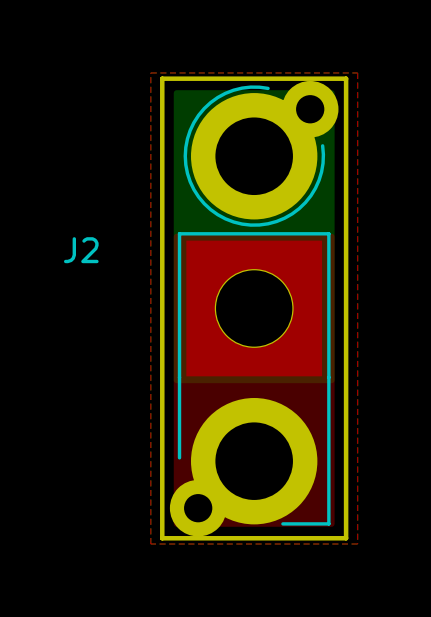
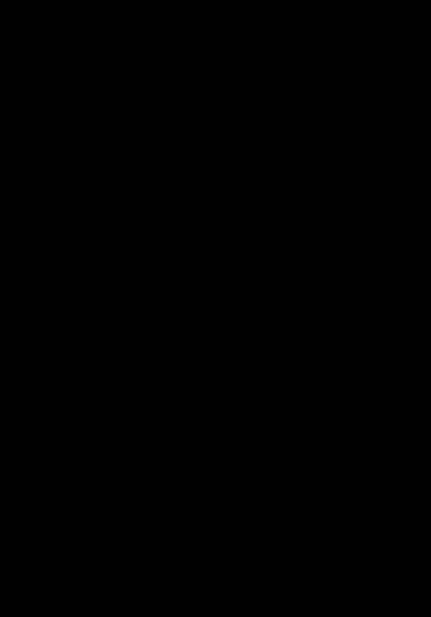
top zone outline: (150, 72) (150, 544) (357, 544) (357, 72) (150, 72) -> none
board edge: (162, 78) (346, 78) (346, 538) (162, 538) (162, 78) -> none
line: (268, 88) (242, 88) (225, 93) (204, 108) (193, 122) (187, 138) (185, 164) (193, 189) (204, 203) (217, 214) (242, 224) (259, 224) (284, 218) (305, 202) (315, 188) (321, 171) (322, 145) -> none
part: (264, 150) -> none
part: (254, 308) -> none
J2: (254, 308) -> none
line: (179, 457) (179, 233) (328, 233) (328, 523) (282, 523) -> none
part: (243, 467) -> none

